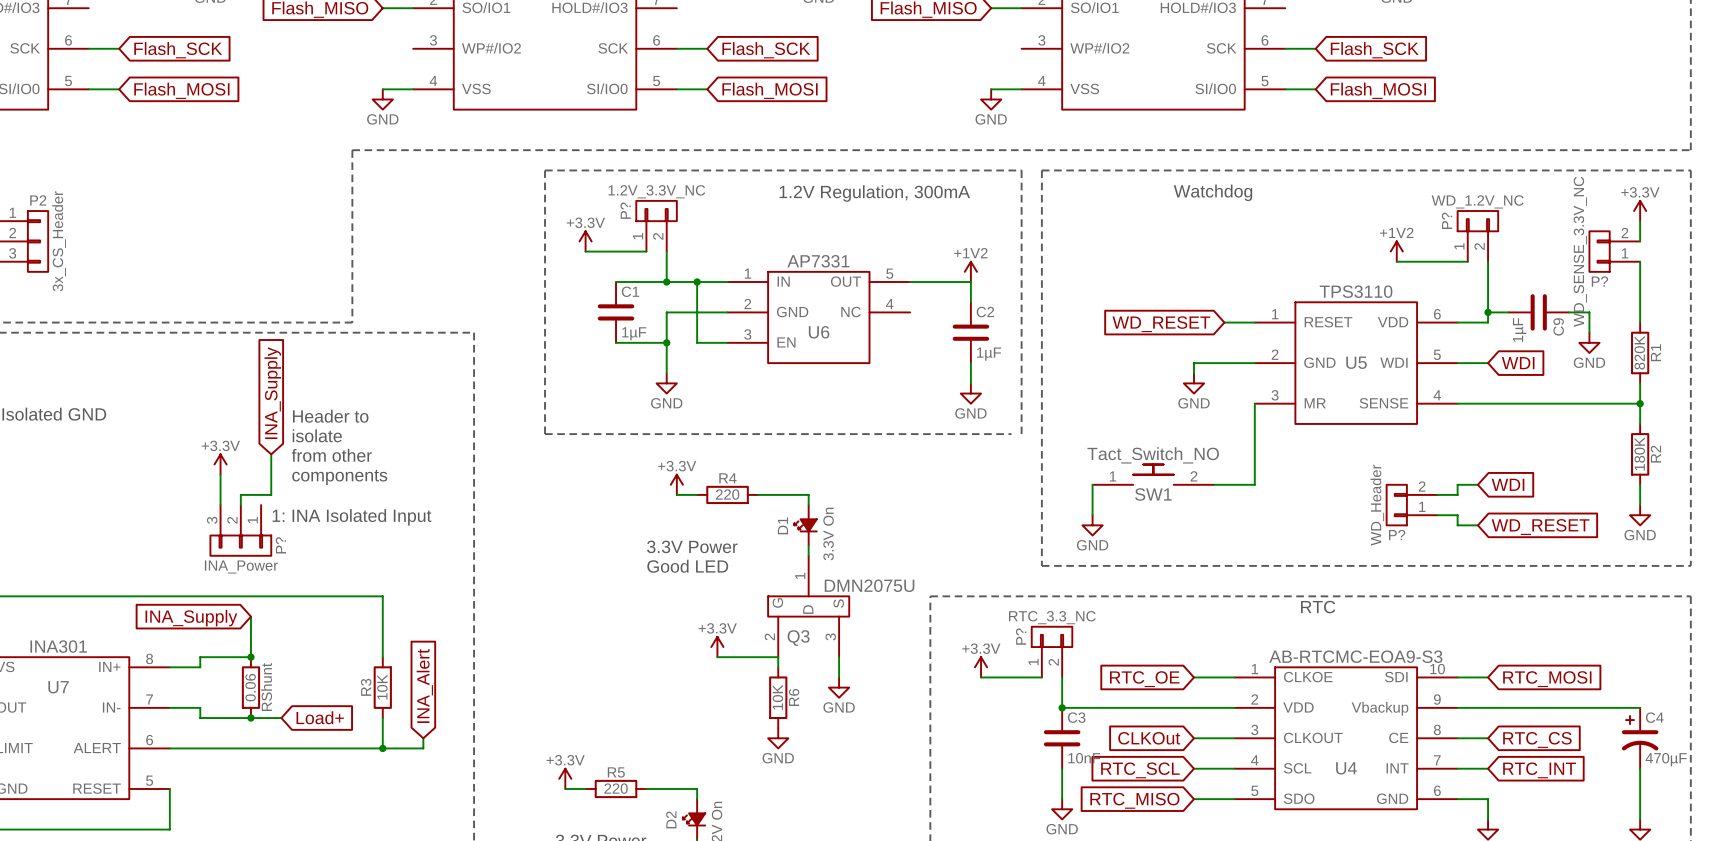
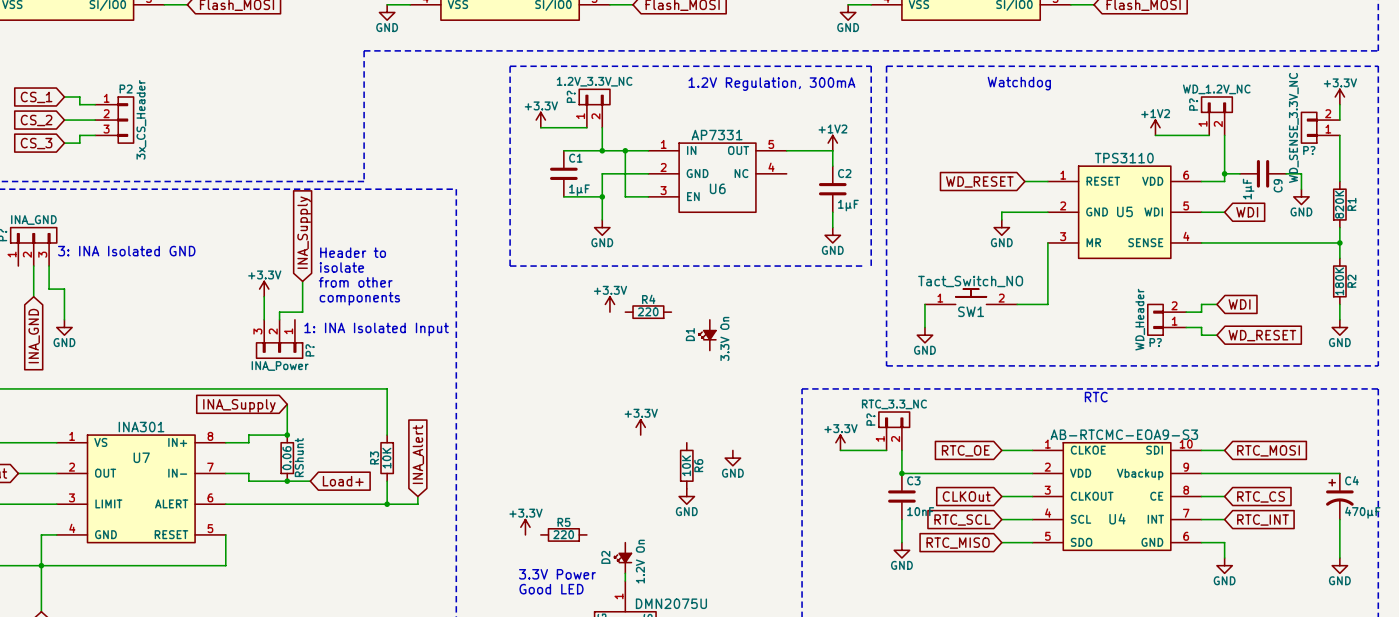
wire: (676, 494) (697, 494) -> none
wire: (757, 494) (808, 494) (808, 505) -> none
wire: (808, 545) (808, 555) -> none
text: 3.3V Power (692, 546) -> none
text: Good LED (687, 566) -> none
Q3: DMN2075U (808, 606) -> none
wire: (717, 657) (778, 657) (778, 667) -> none
wire: (839, 657) (839, 677) -> none
wire: (565, 789) (585, 789) -> none
wire: (646, 789) (697, 789) (697, 799) -> none

